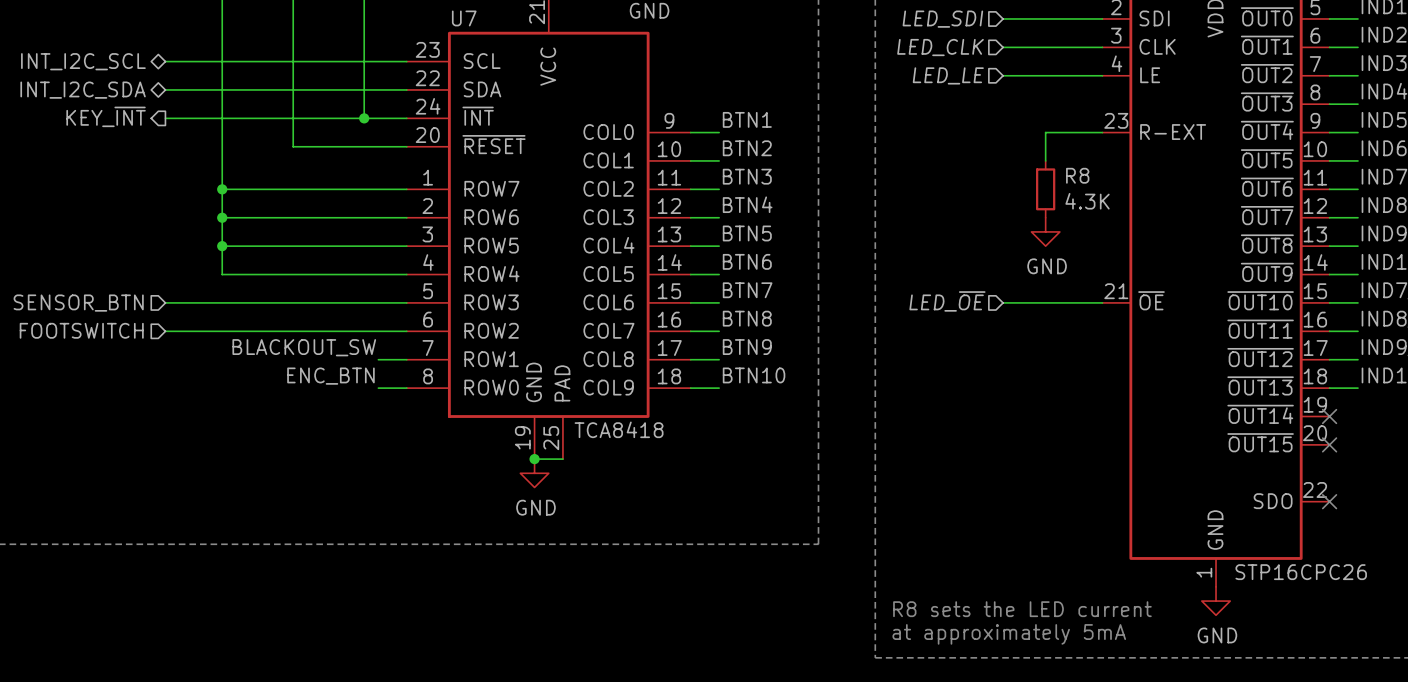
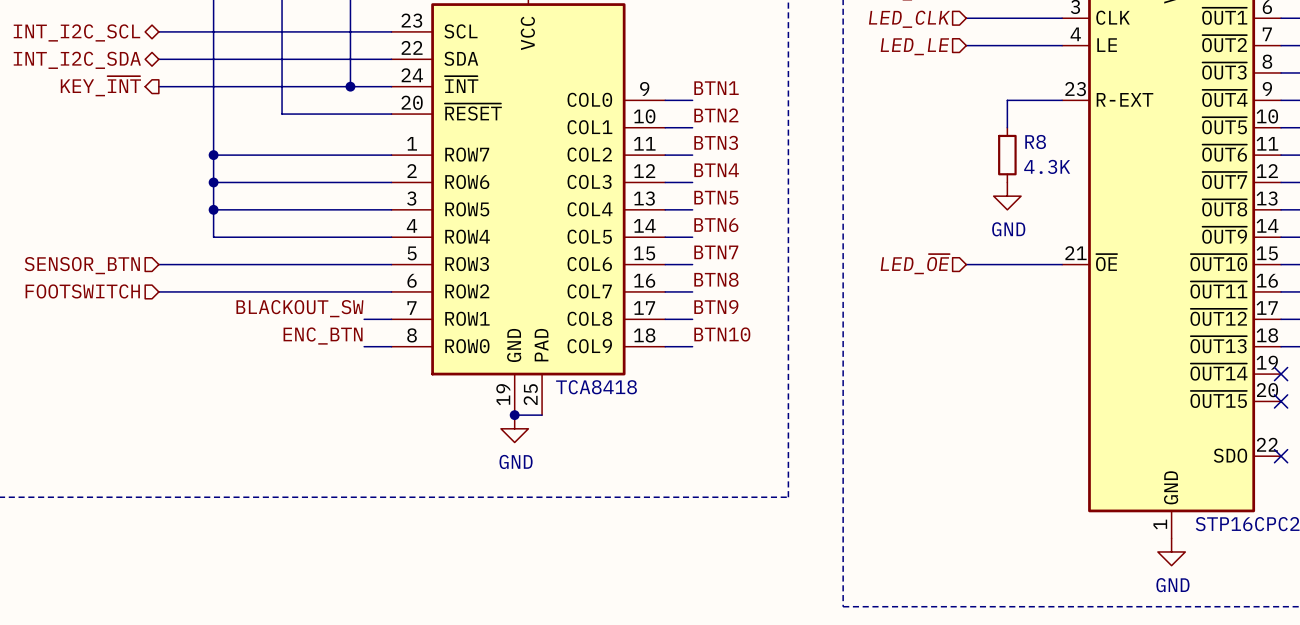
text: R8 sets the LED current (1022, 609) -> none
text: at approximately 5mA (1009, 634) -> none

